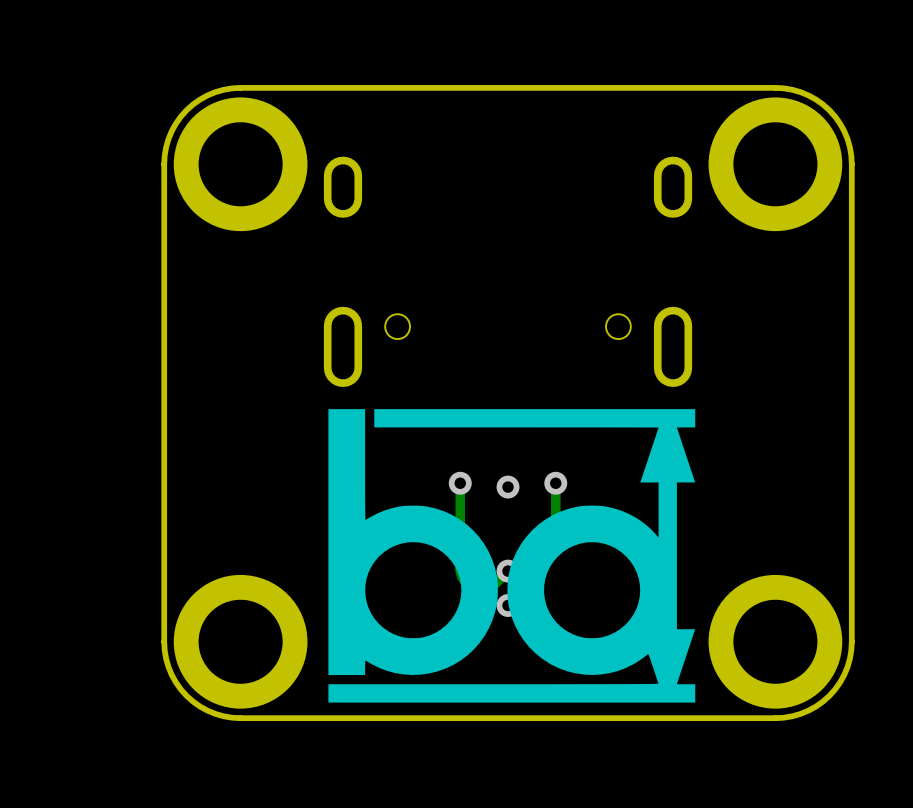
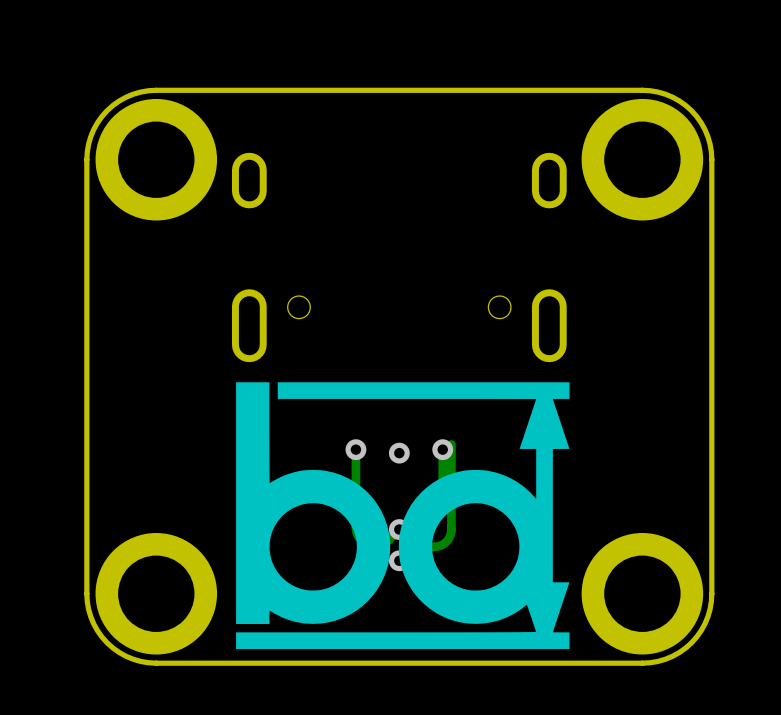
track: none -> (451, 444) (450, 536) (440, 545) (413, 549) (399, 562)

